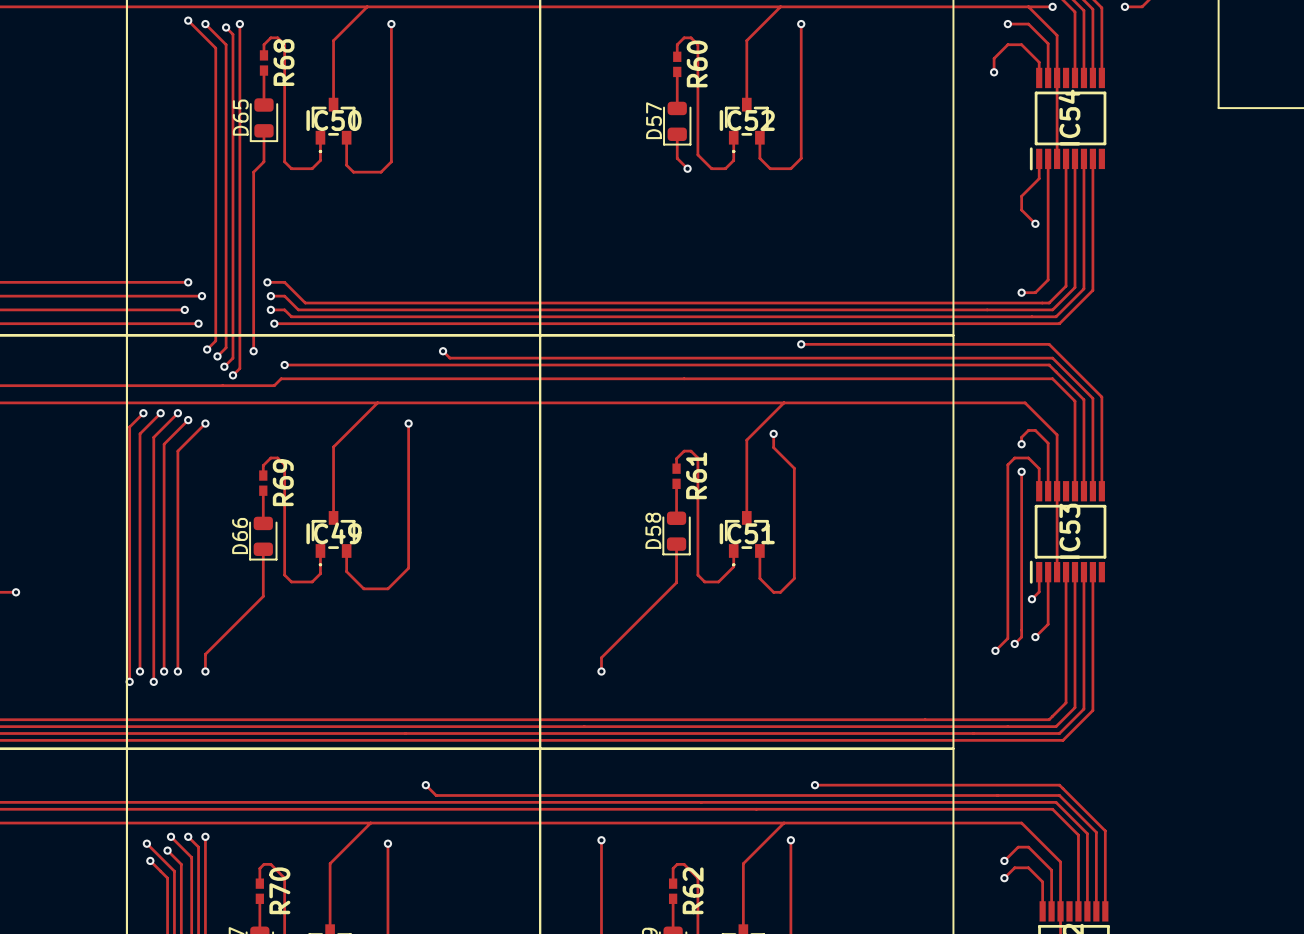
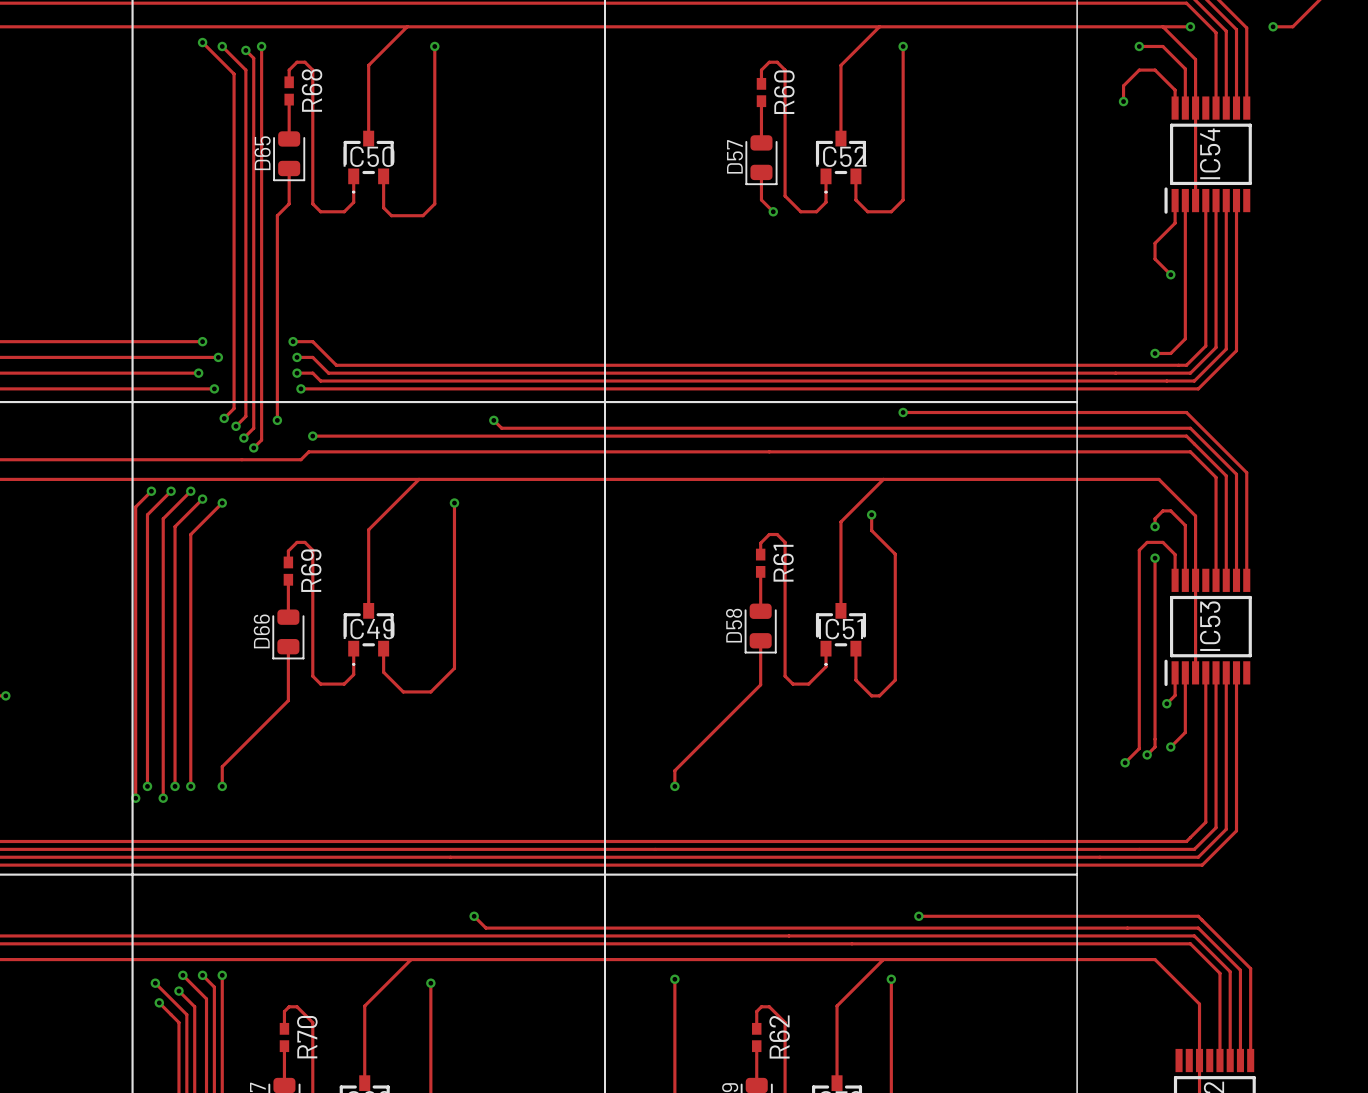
track: (1004, 860) (1018, 847) (1028, 847) (1051, 870) (1051, 911) -> none
via: (1004, 860) -> none
track: (1004, 878) (1014, 867) (1028, 867) (1042, 881) (1042, 911) -> none
via: (1004, 878) -> none

